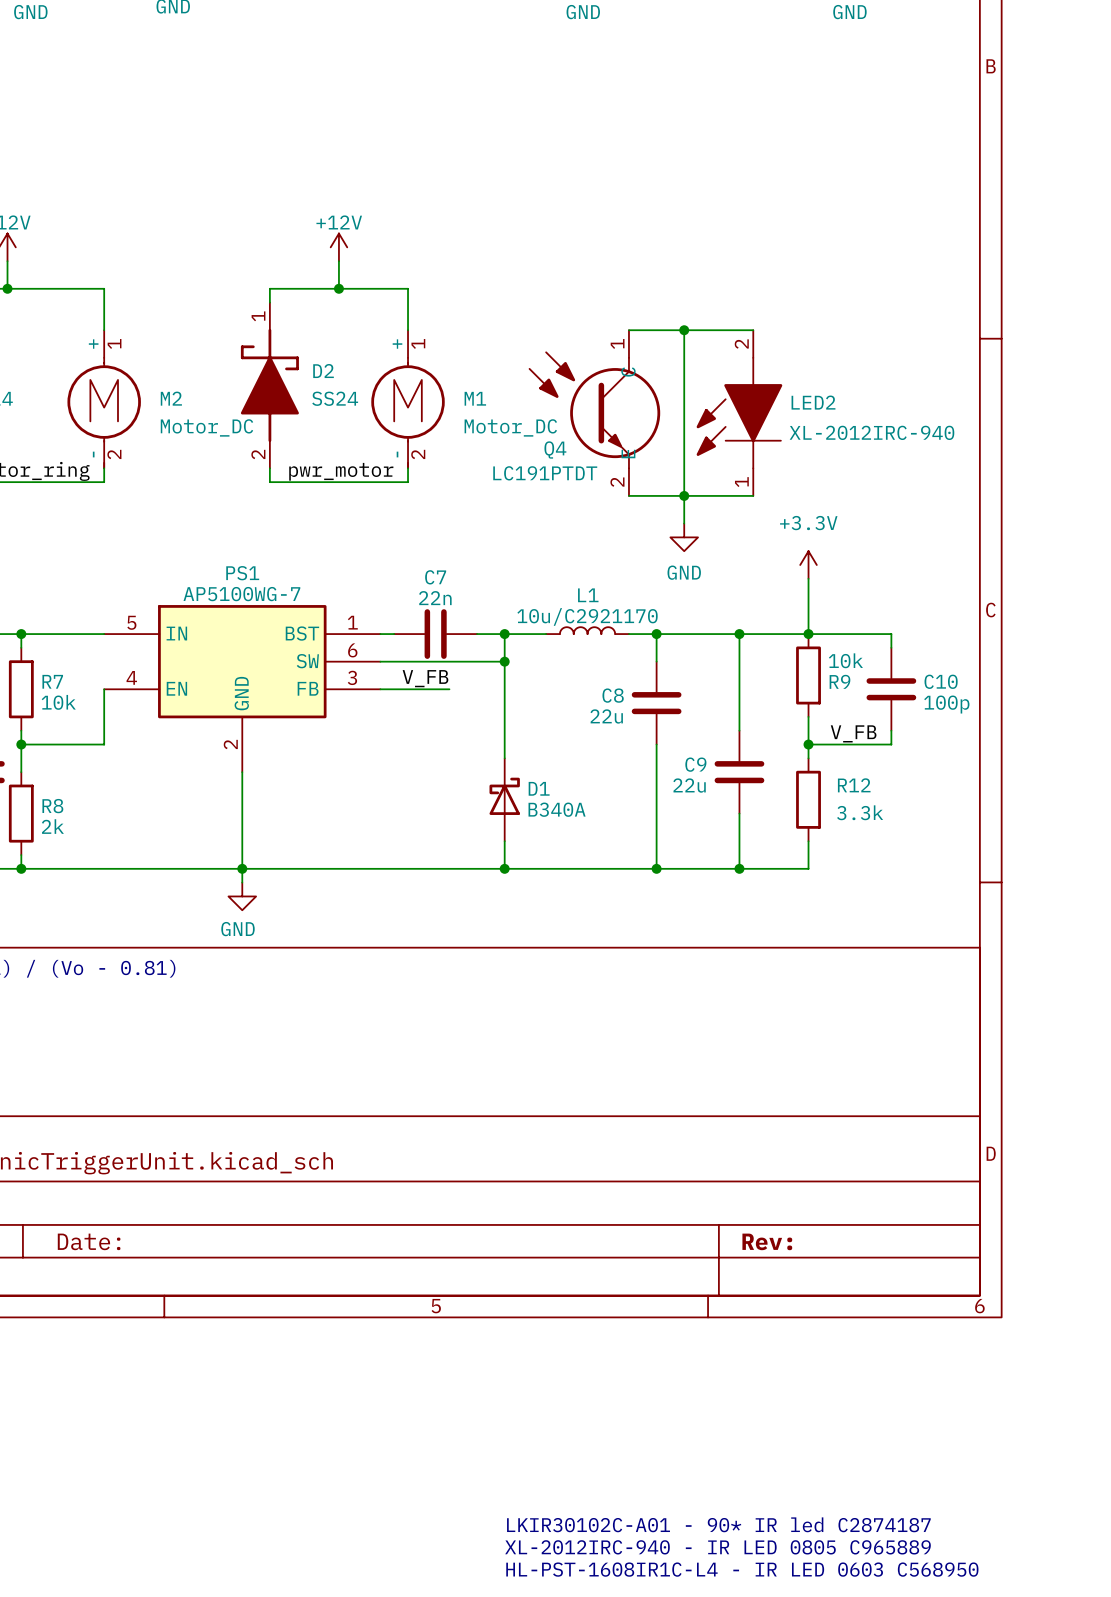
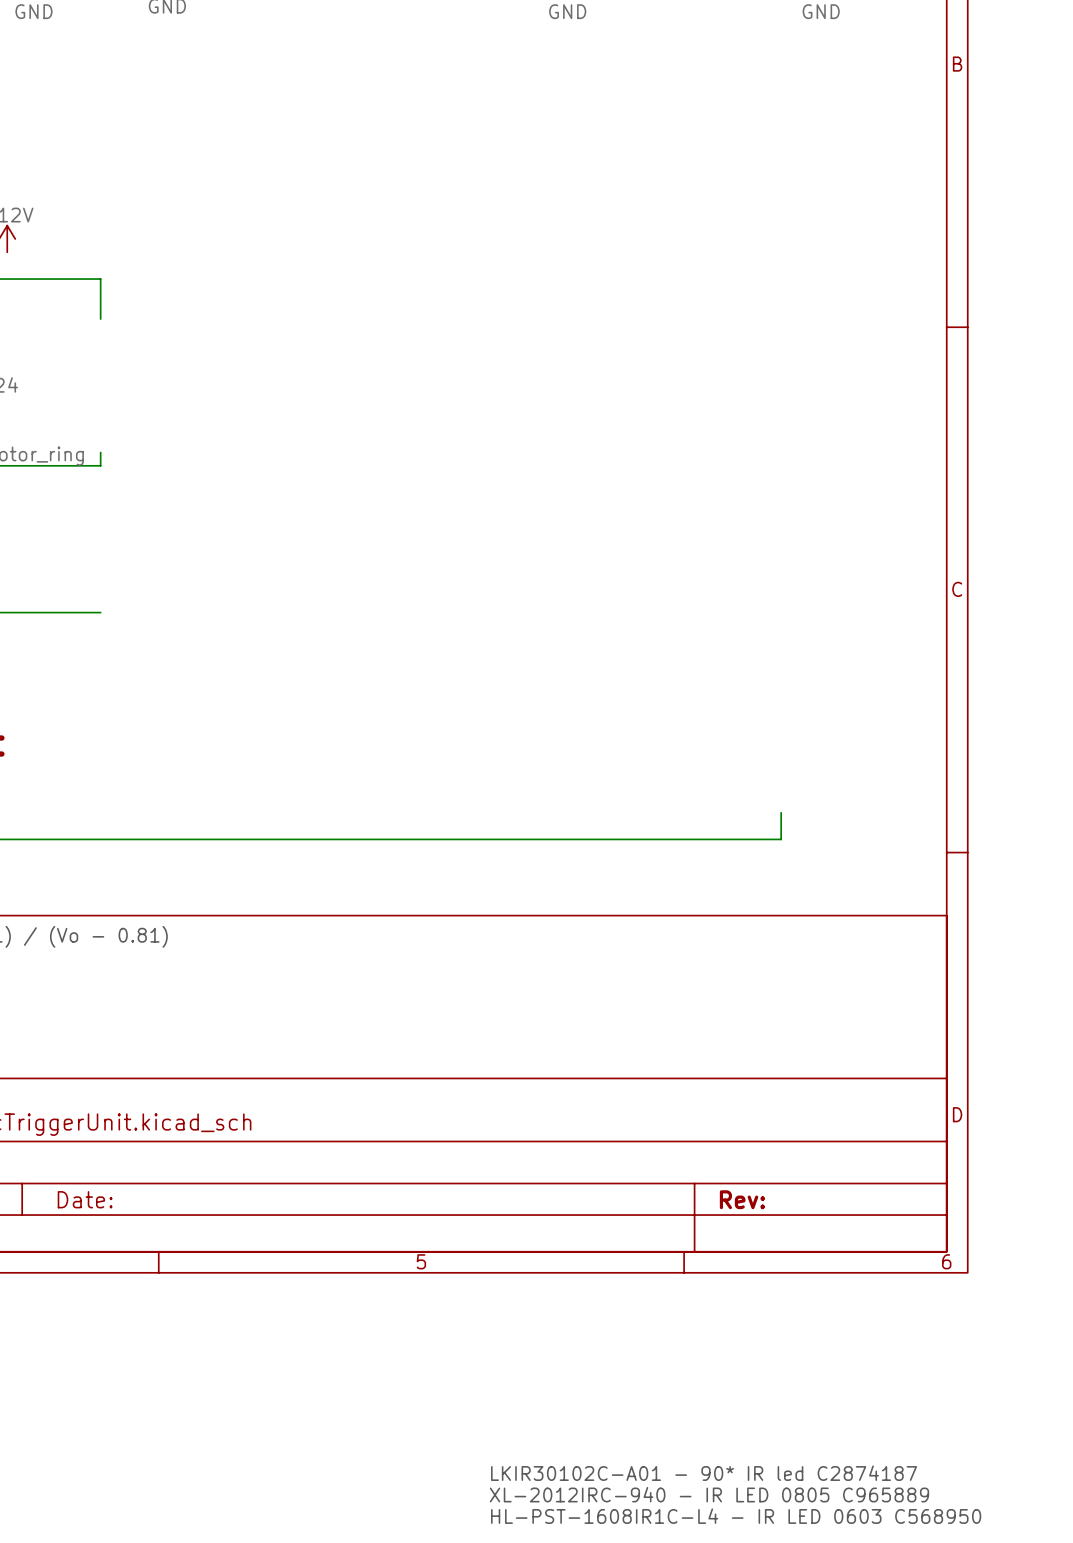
power symbol: +12V (338, 247) -> none
wire: (7, 261) (7, 288) -> none
wire: (338, 261) (338, 288) -> none
junction: (7, 288) -> none
junction: (338, 288) -> none
wire: (269, 302) (269, 288) (408, 288) (408, 330) -> none
wire: (628, 330) (753, 330) -> none
wire: (684, 330) (684, 523) -> none
junction: (684, 330) -> none
D2: SS24 (269, 385) -> none
M2: Motor_DC (104, 399) -> none
M1: Motor_DC (408, 399) -> none
Q4: LC191PTDT (594, 413) -> none
LED2: XL-2012IRC-940 (739, 413) -> none
wire: (269, 468) (269, 482) (408, 482) (408, 468) -> none
label: pwr_motor (341, 471) -> none
wire: (628, 495) (753, 495) -> none
junction: (684, 495) -> none
power symbol: GND (684, 537) -> none
power symbol: +3.3V (808, 565) -> none
wire: (808, 578) (808, 634) -> none
L1: 10u/C2921170 (587, 630) -> none
wire: (21, 634) (21, 647) -> none
junction: (21, 634) -> none
wire: (380, 634) (394, 634) -> none
C7: 22n (435, 634) -> none
wire: (477, 634) (546, 634) -> none
wire: (504, 634) (504, 758) -> none
junction: (504, 634) -> none
wire: (628, 634) (891, 634) (891, 647) -> none
wire: (656, 634) (656, 661) -> none
junction: (656, 634) -> none
wire: (739, 634) (739, 730) -> none
junction: (739, 634) -> none
junction: (808, 634) -> none
wire: (380, 661) (504, 661) -> none
junction: (504, 661) -> none
R9: 10k (808, 675) -> none
label: V_FB (425, 678) -> none
PS1: AP5100WG-7 (242, 688) -> none
R7: 10k (21, 689) -> none
wire: (104, 689) (104, 744) (21, 744) -> none
wire: (380, 689) (449, 689) -> none
C10: 100p (891, 689) -> none
C8: 22u (656, 703) -> none
wire: (808, 716) (808, 758) -> none
wire: (21, 730) (21, 772) -> none
wire: (891, 730) (891, 744) (808, 744) -> none
label: V_FB (853, 733) -> none
junction: (21, 744) -> none
wire: (656, 744) (656, 868) -> none
junction: (808, 744) -> none
wire: (242, 772) (242, 882) -> none
C9: 22u (739, 772) -> none
D1: B340A (504, 799) -> none
R12: 3.3k (808, 799) -> none
R8: 2k (21, 813) -> none
wire: (739, 813) (739, 868) -> none
wire: (504, 841) (504, 868) -> none
wire: (21, 855) (21, 868) -> none
junction: (21, 868) -> none
junction: (242, 868) -> none
junction: (504, 868) -> none
junction: (656, 868) -> none
junction: (739, 868) -> none
power symbol: GND (242, 896) -> none

